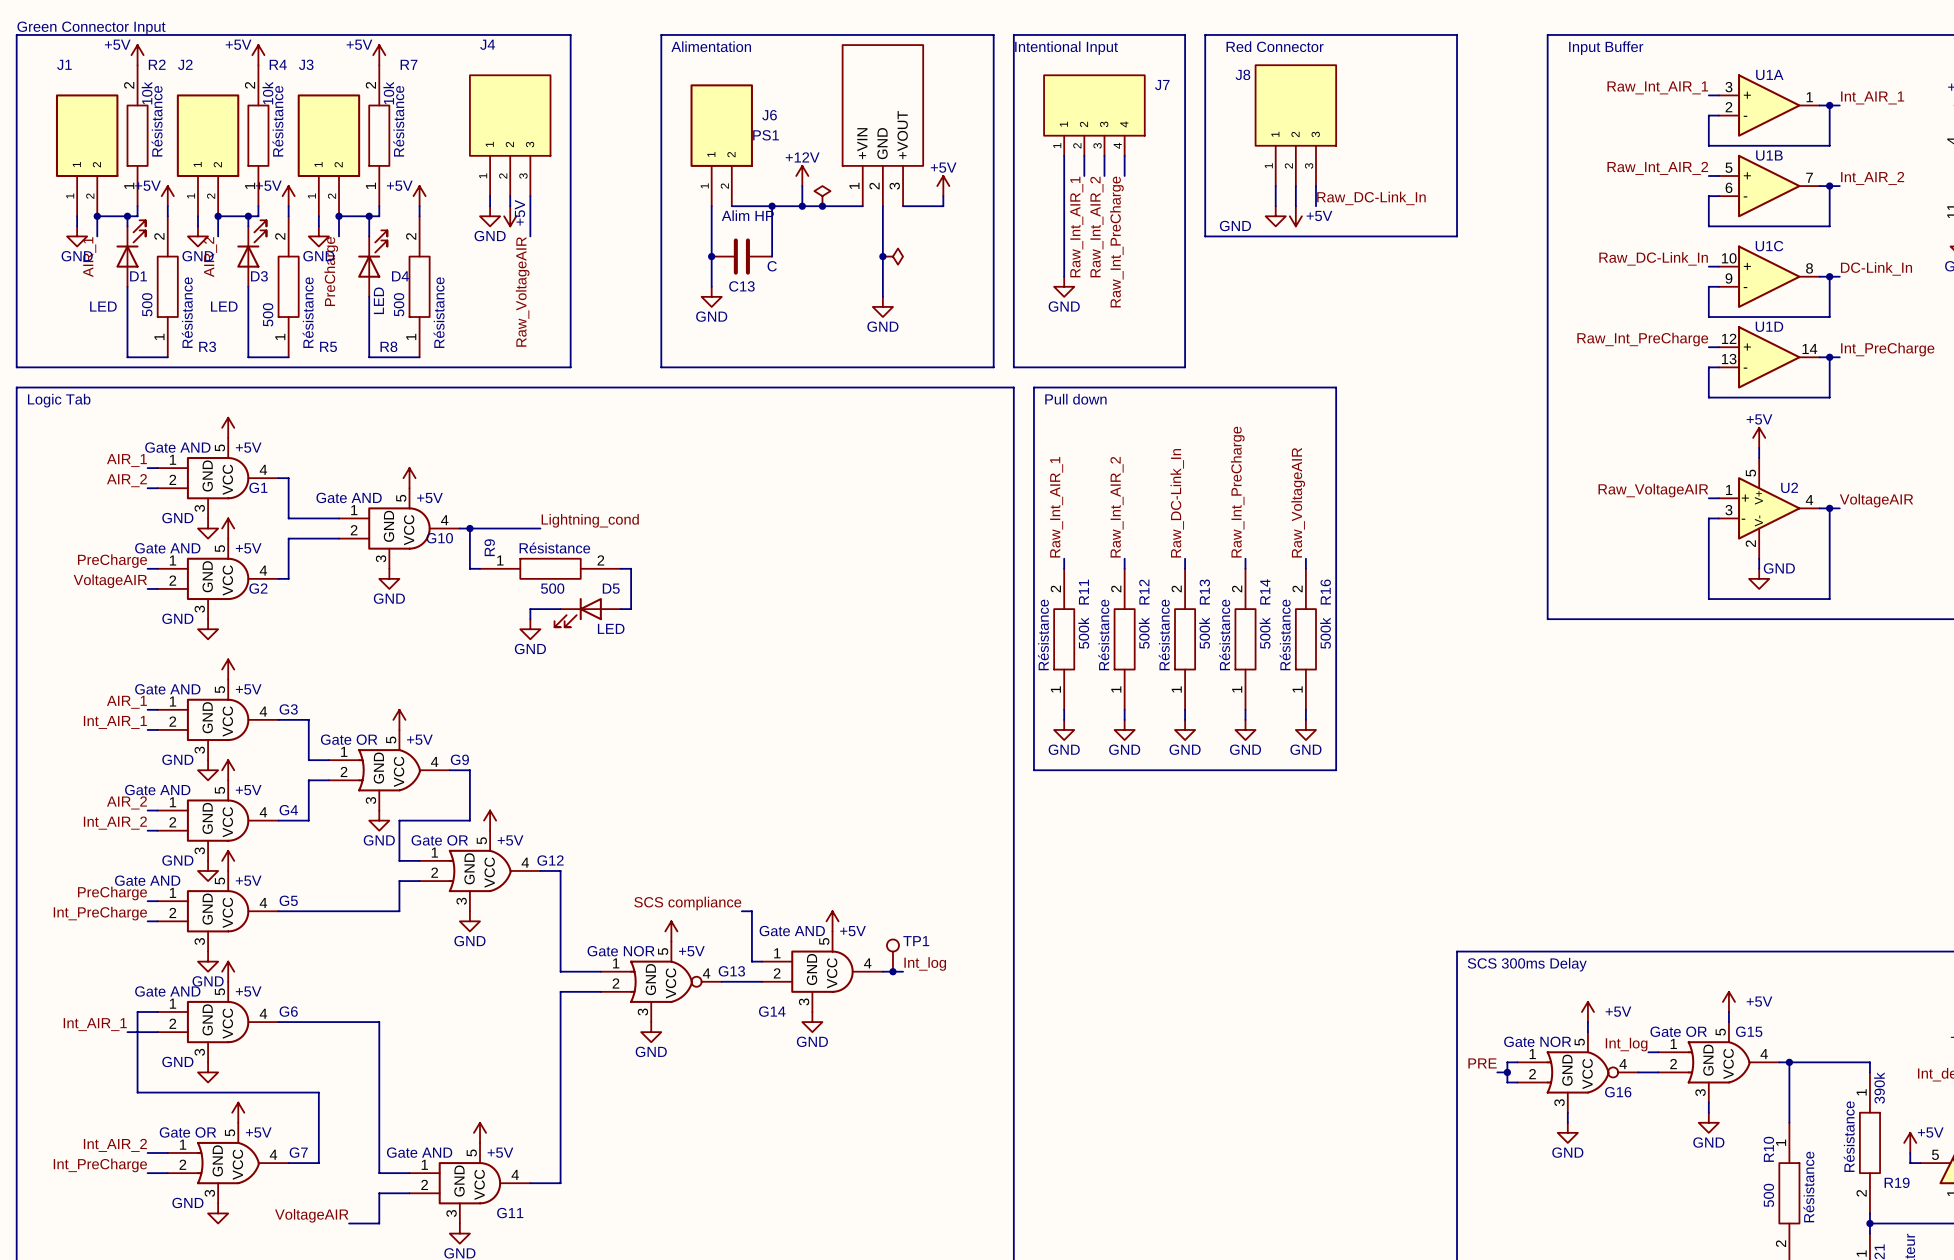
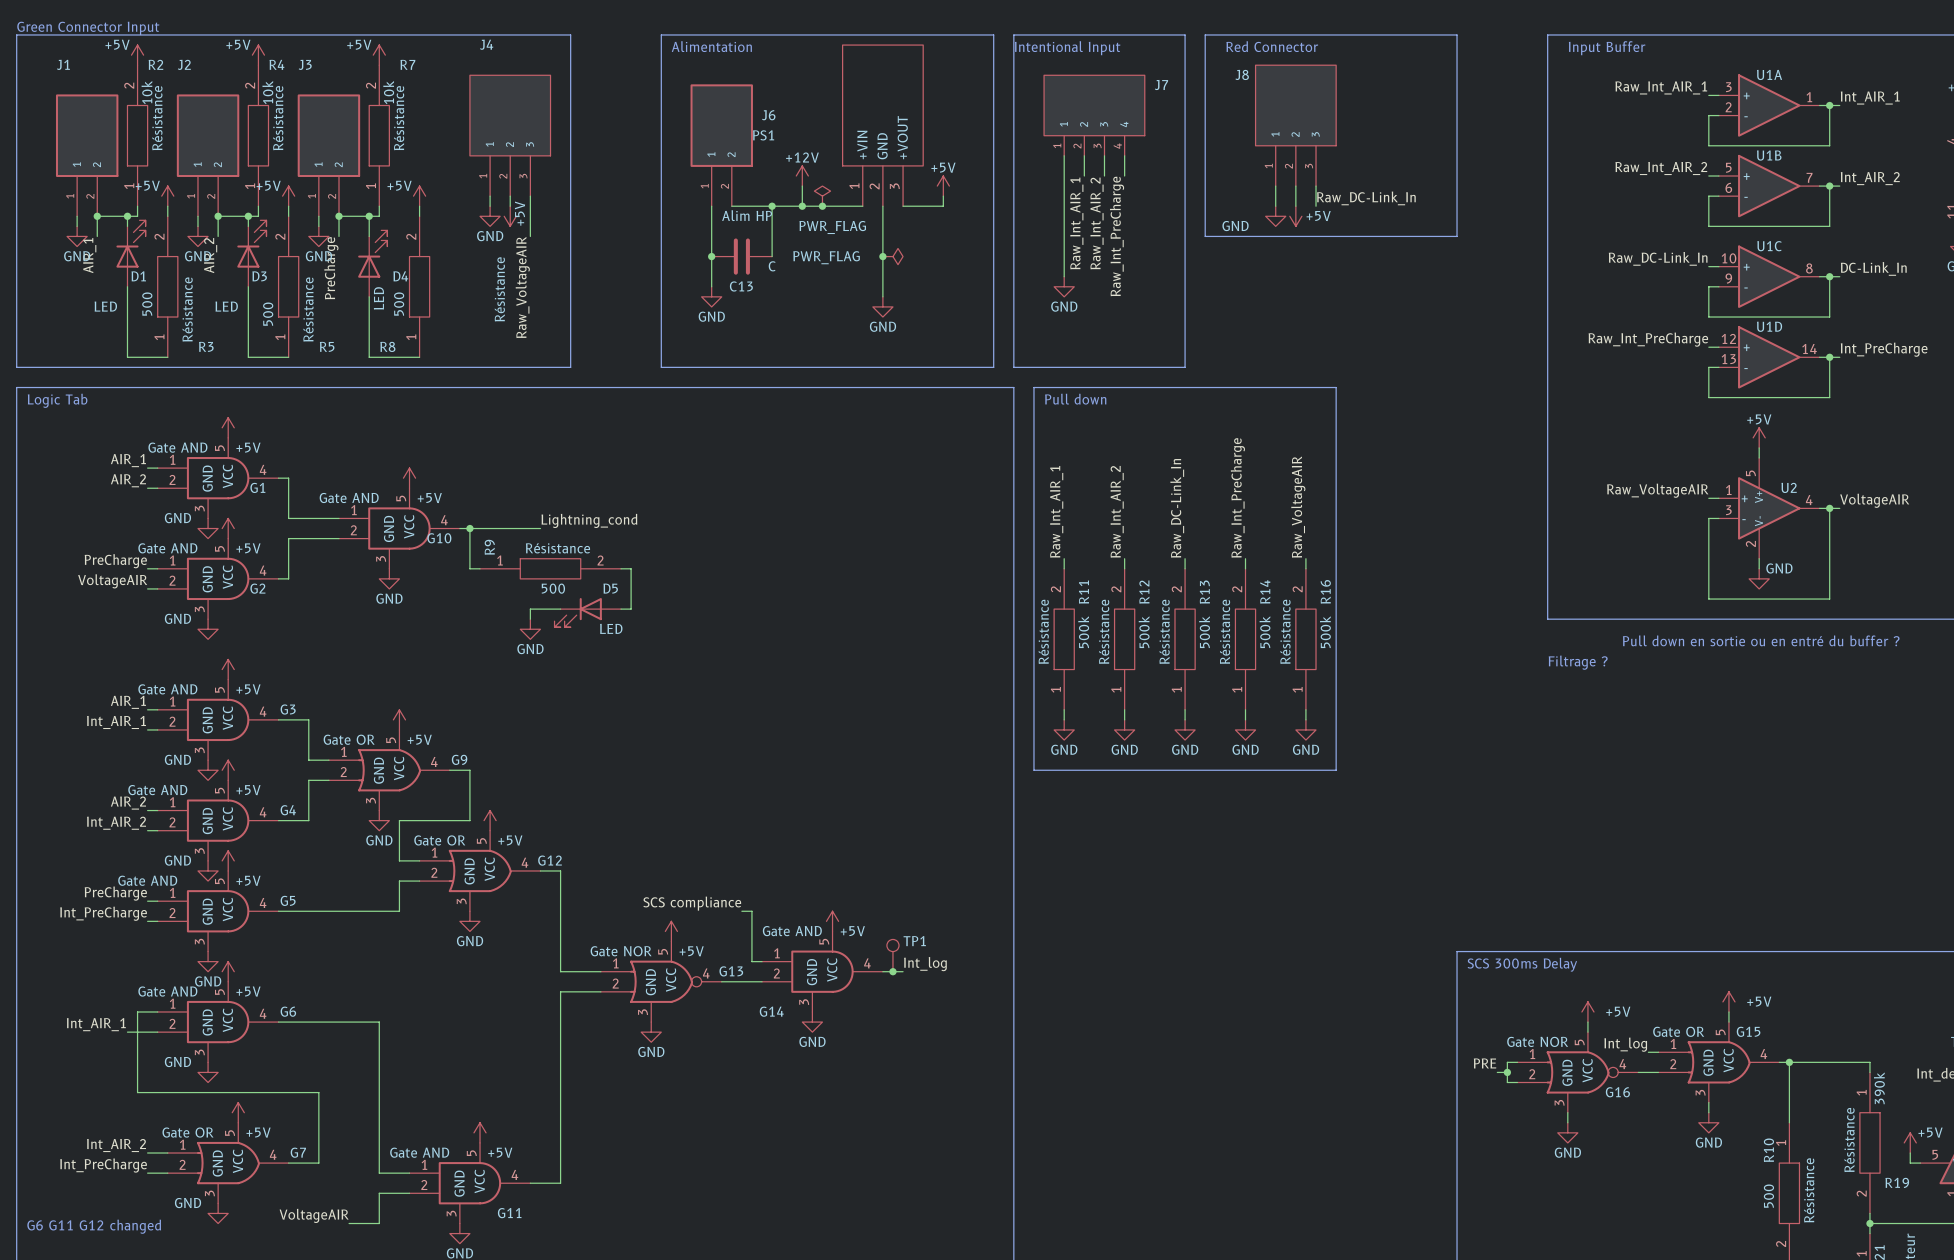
power symbol text: none -> PWR_FLAG (832, 227)
power symbol text: none -> PWR_FLAG (826, 257)
R8 text position: Résistance (439, 312) -> Résistance (499, 289)
text: none -> Pull down en sortie ou en entré du buffer ? (1761, 640)
text: none -> Filtrage ? (1578, 662)
text: none -> G6 G11 G12 changed (94, 1226)

